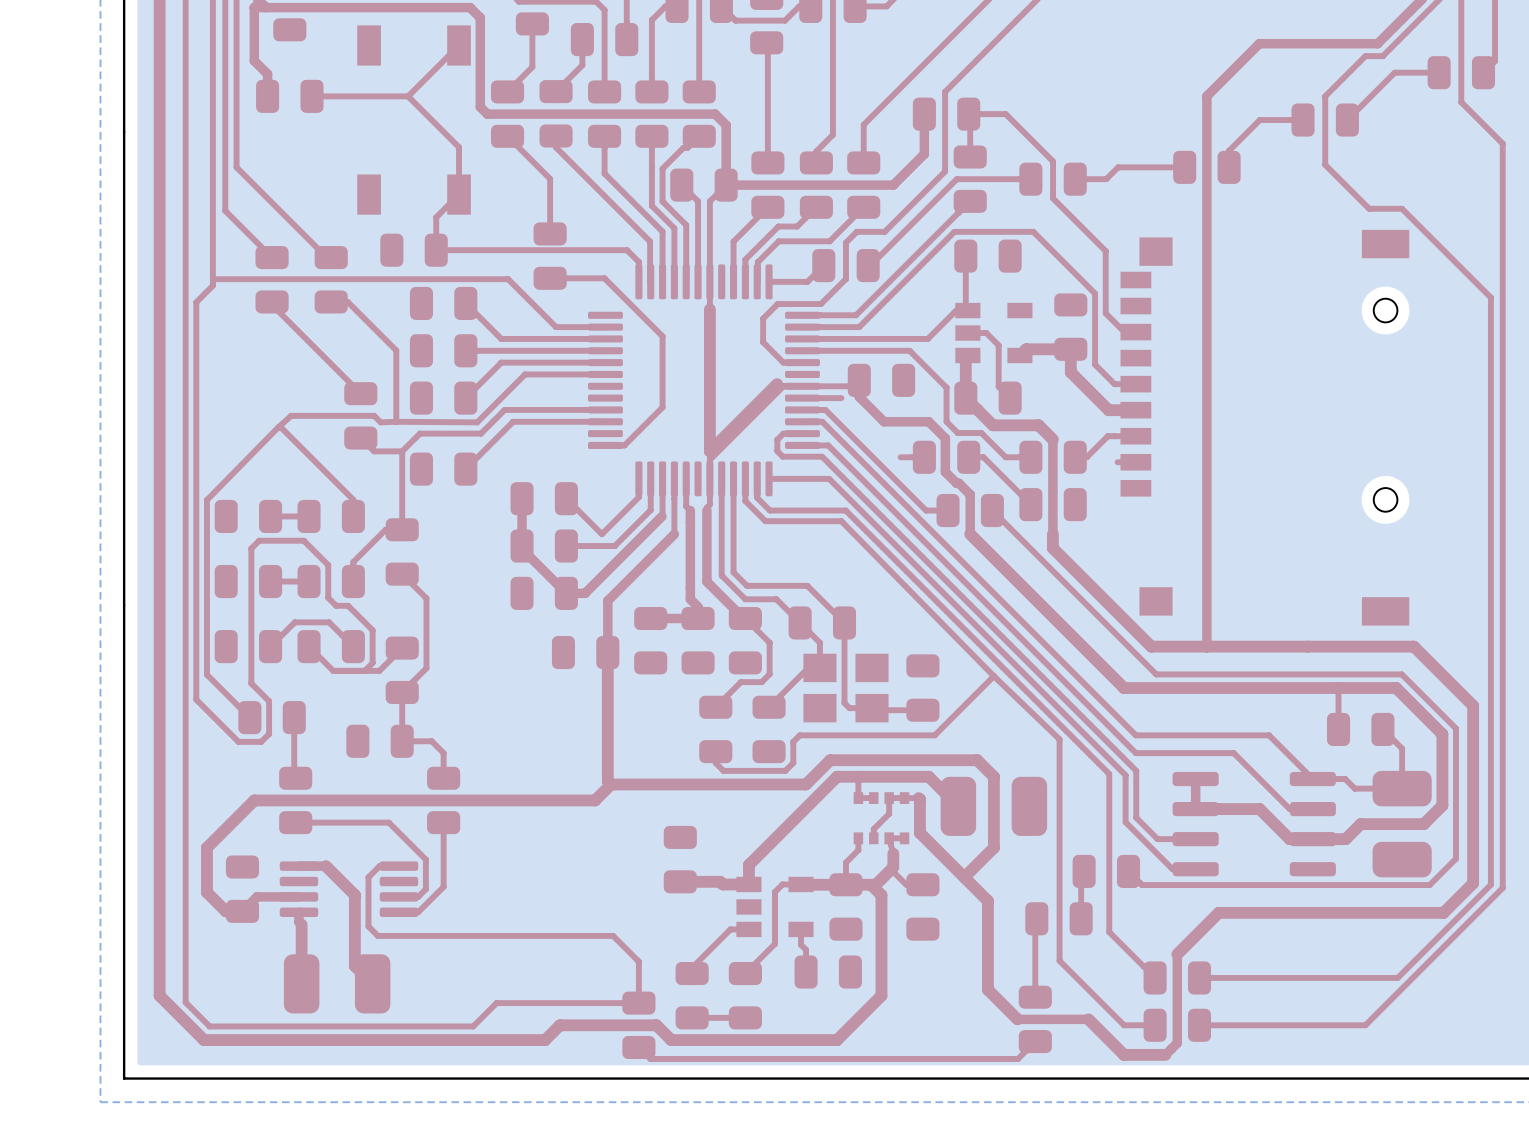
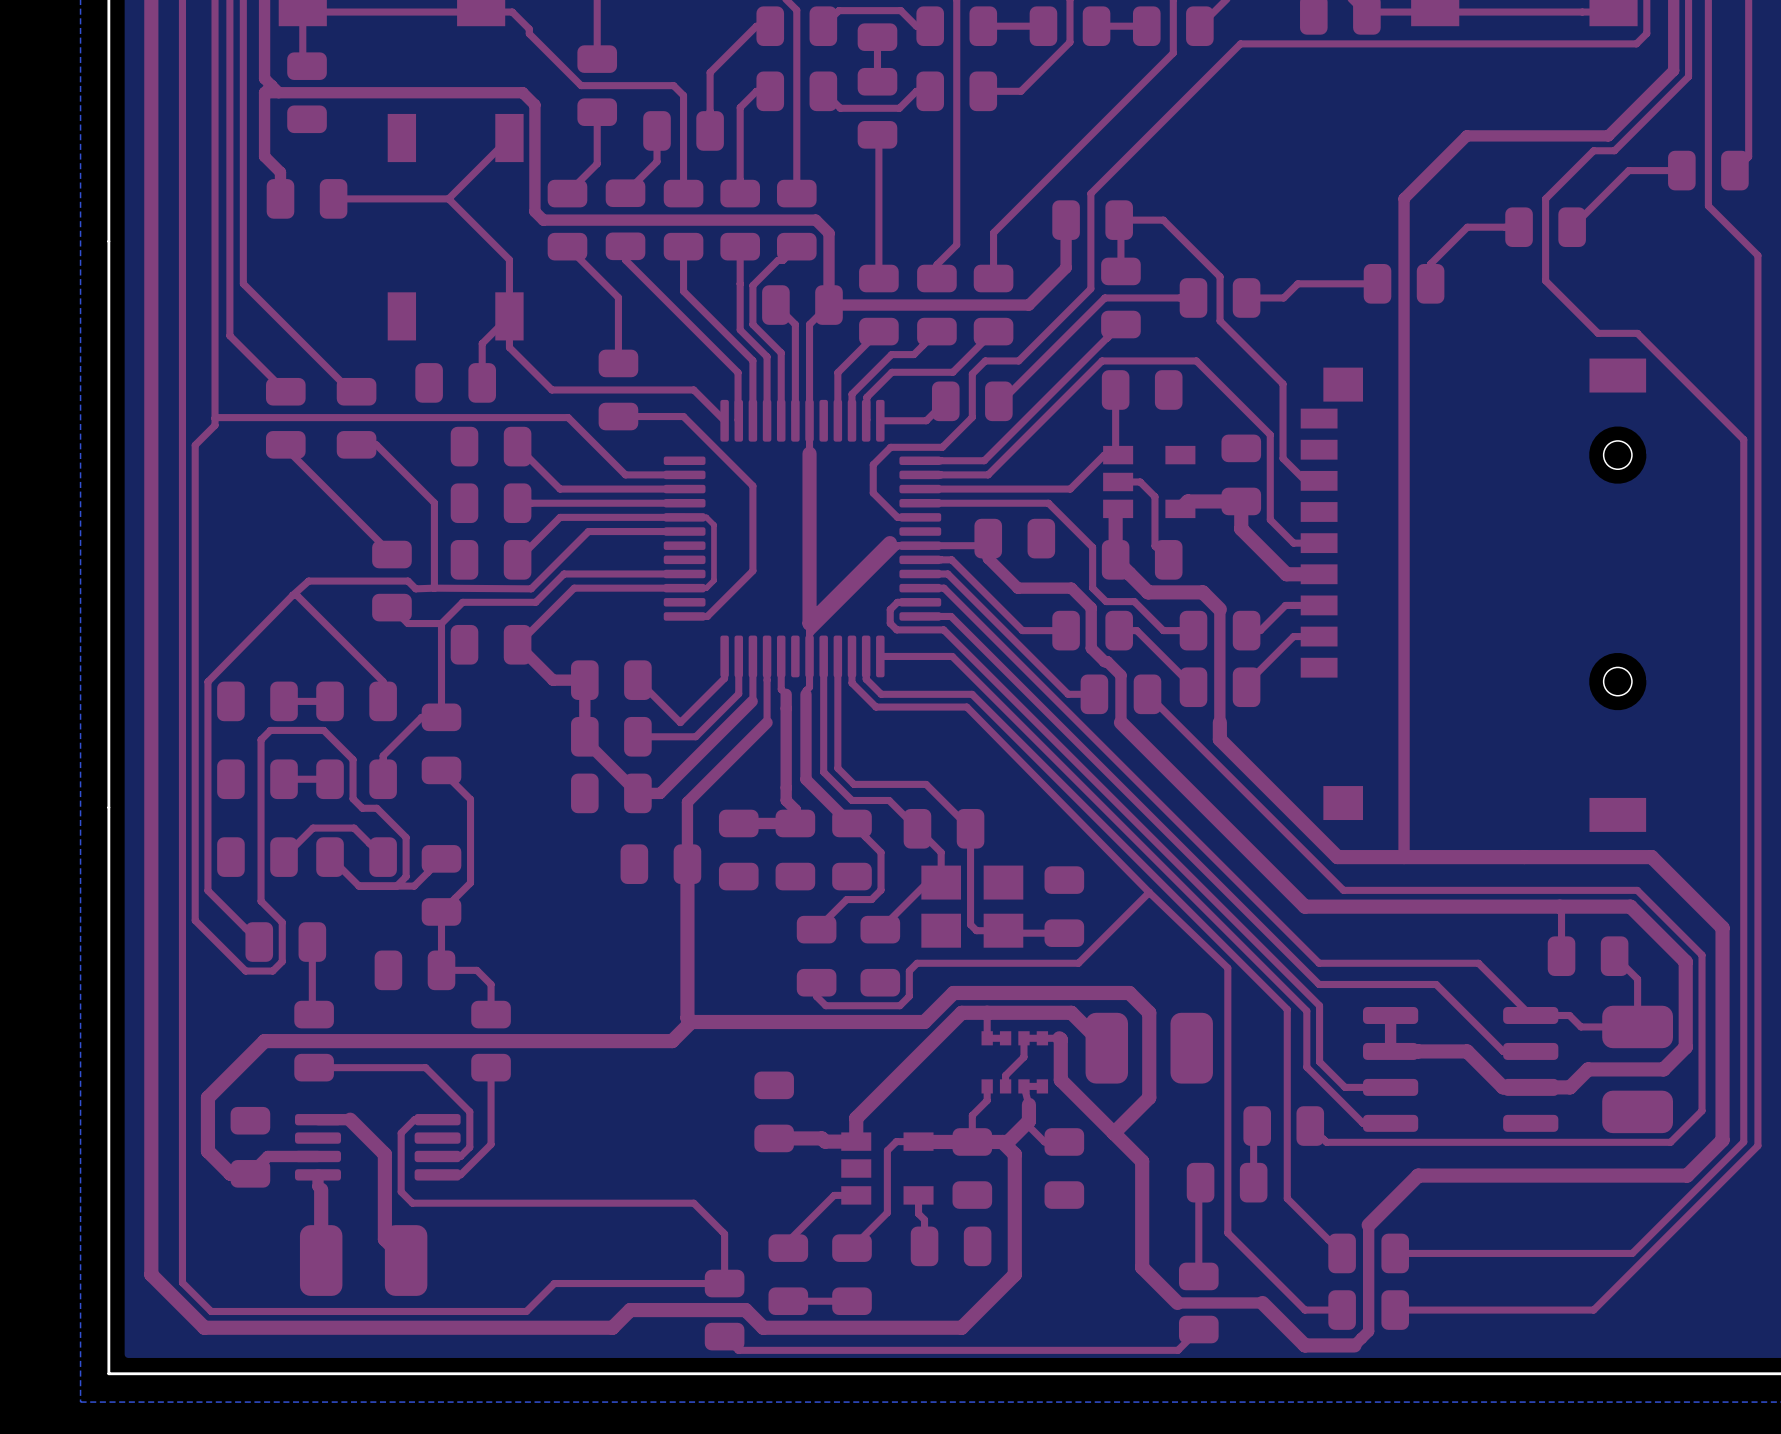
top track: (436, 250) (627, 250) (638, 262) (638, 281) -> (509, 316) (509, 347) (551, 389) (693, 389) (724, 420)
top track: none -> (684, 517) (706, 517) (713, 525) (713, 580) (706, 588) (684, 588)
top track: (841, 398) (828, 398) -> (1037, 630) (1022, 630) (951, 559)
top track: none -> (1297, 636) (1293, 636) (1246, 683) (1246, 687)
top track: none -> (517, 644) (552, 680) (584, 680)

